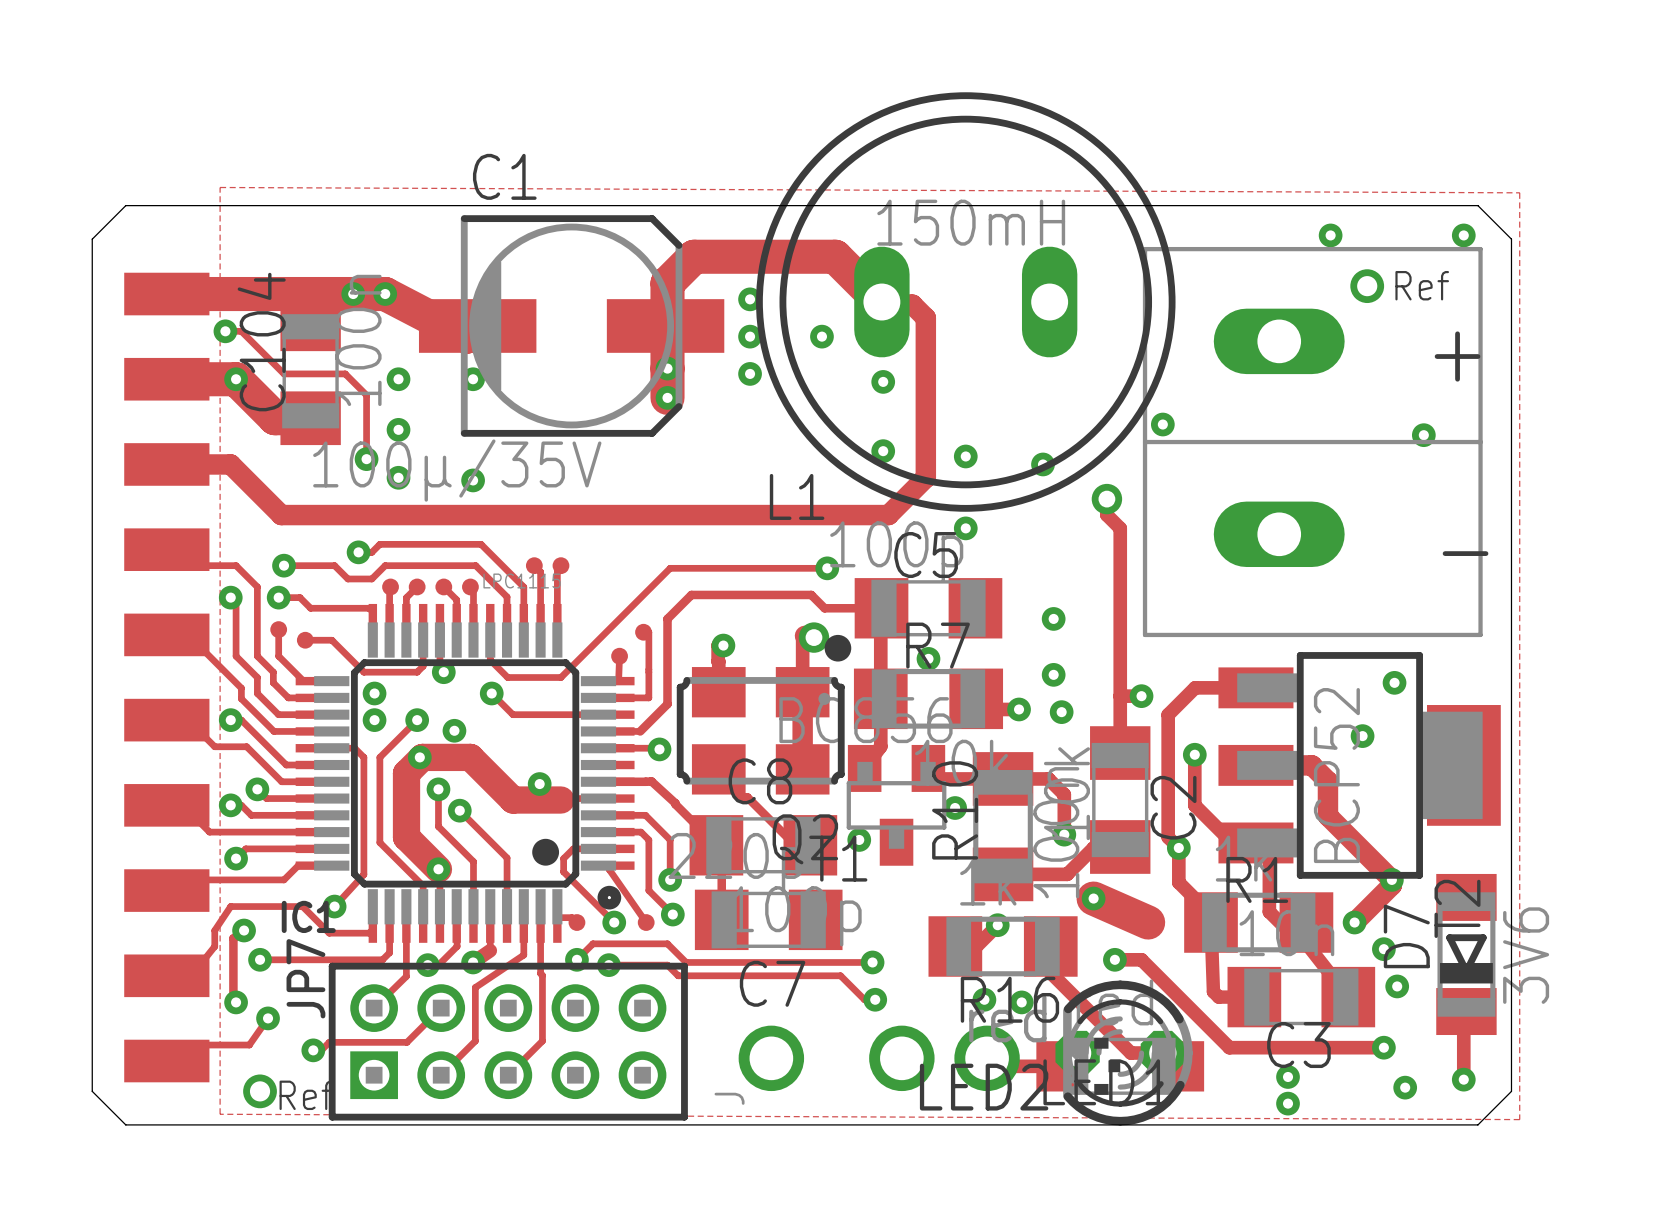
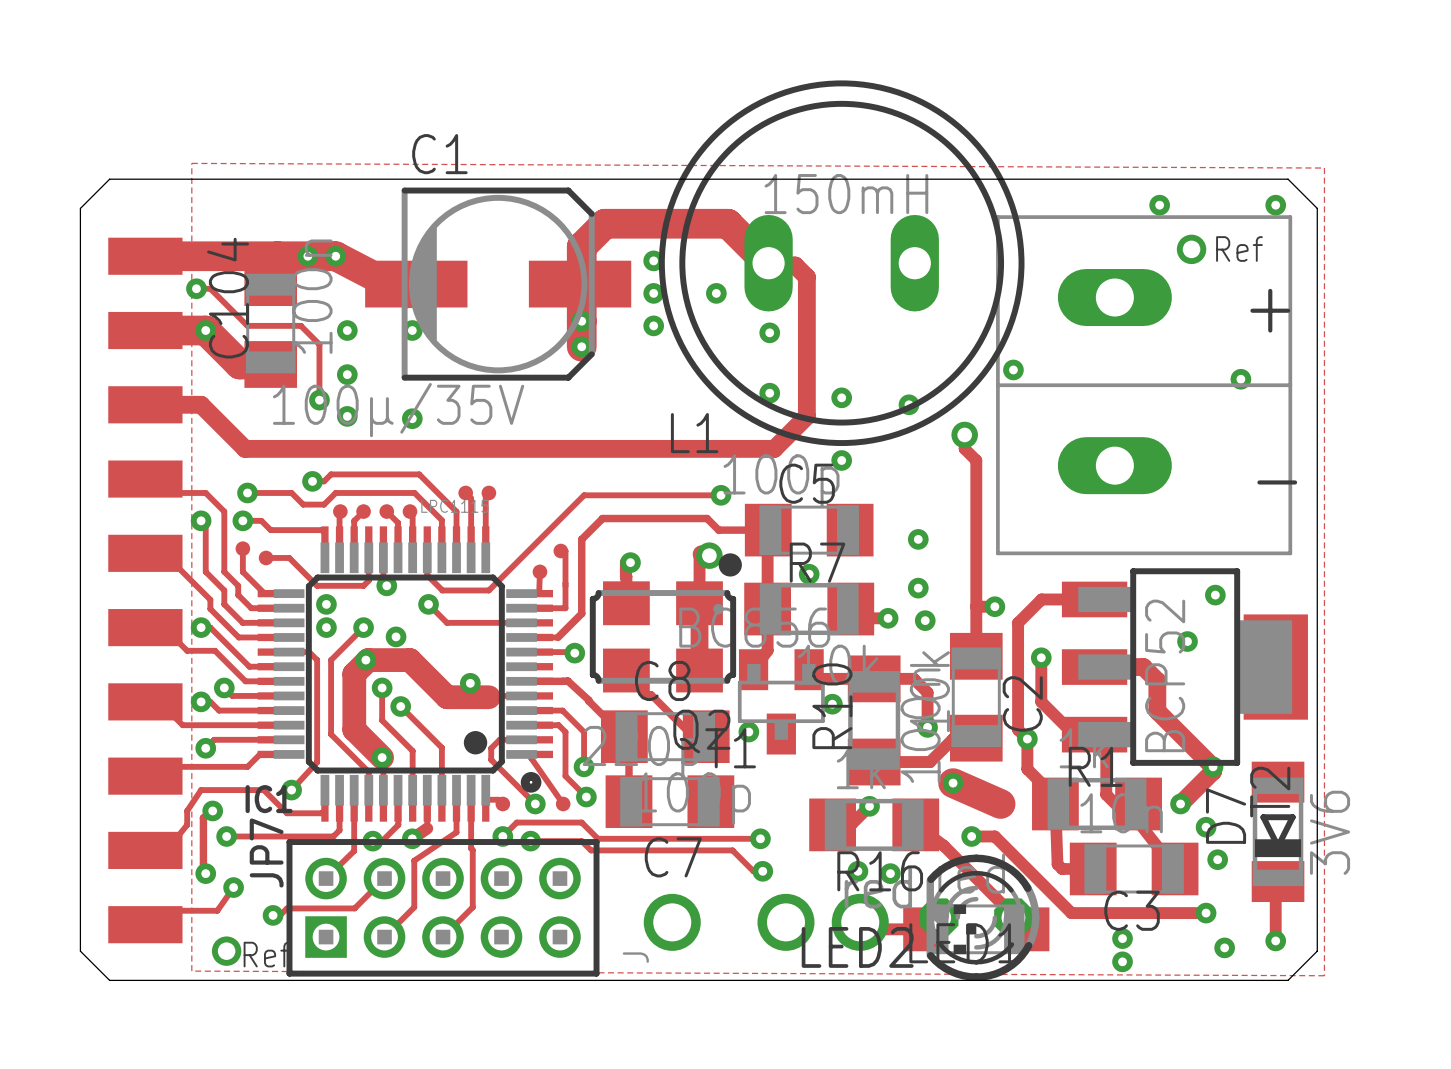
track: (1050, 946) (1050, 973) (1130, 1053) (1162, 1053) -> (915, 824) (943, 845) (1013, 915) (1013, 917)

